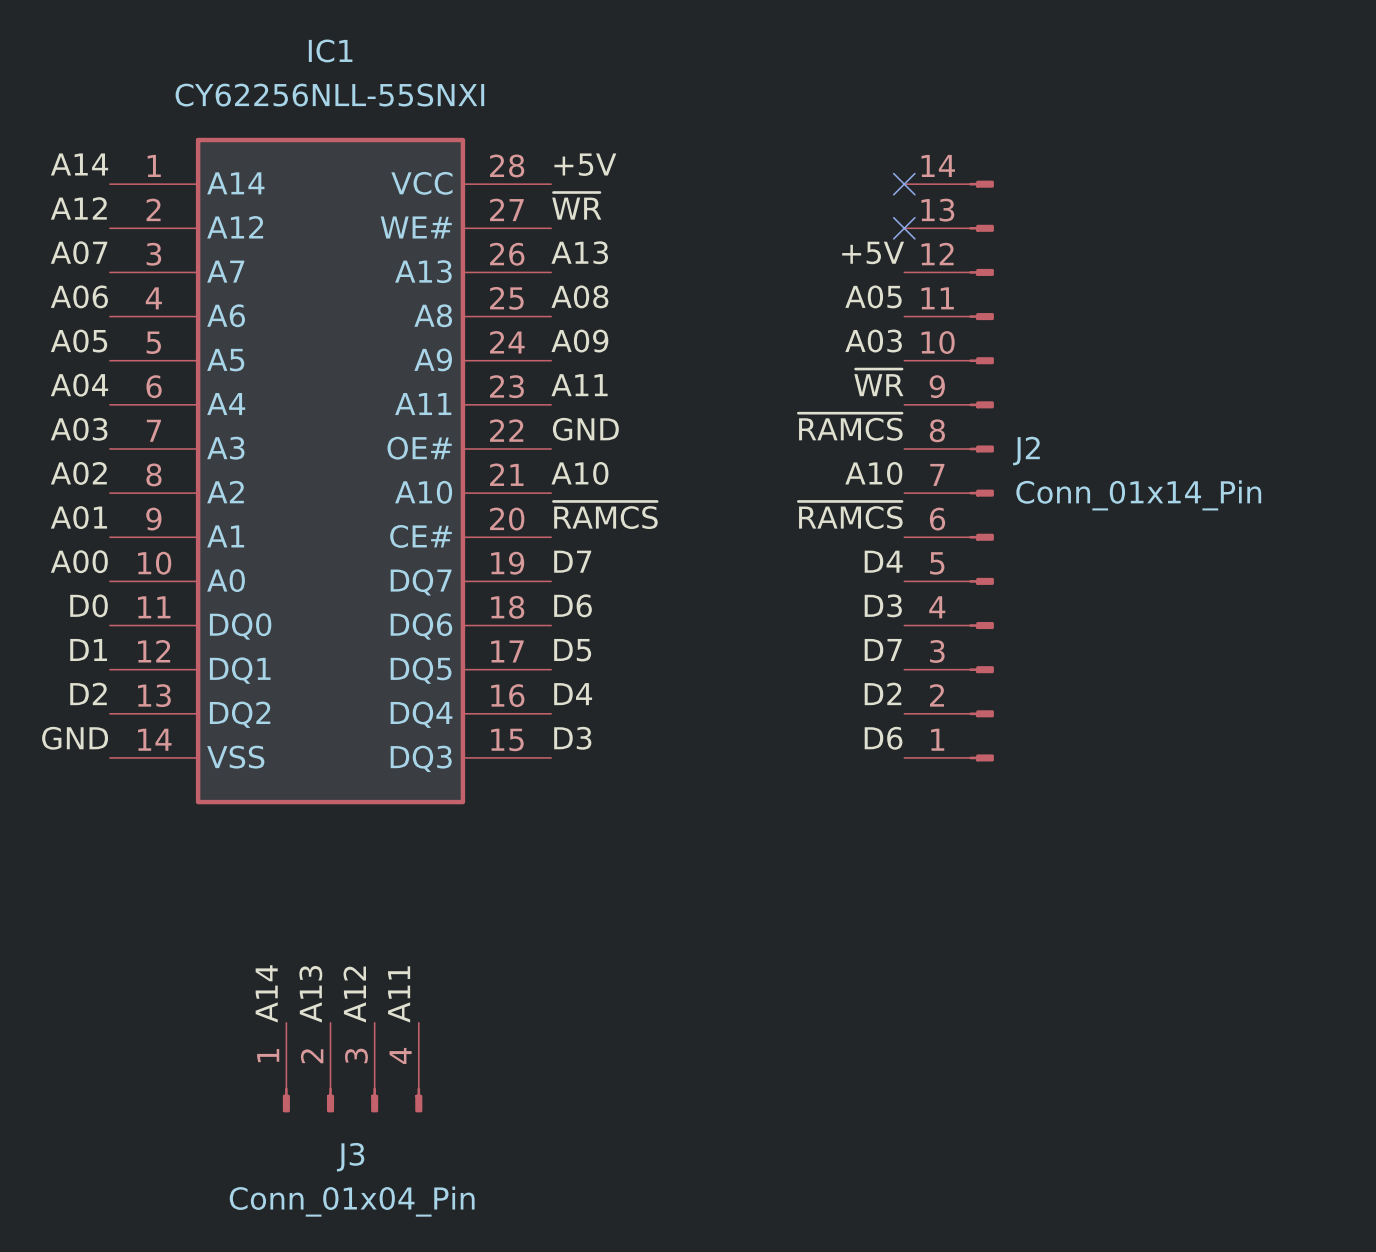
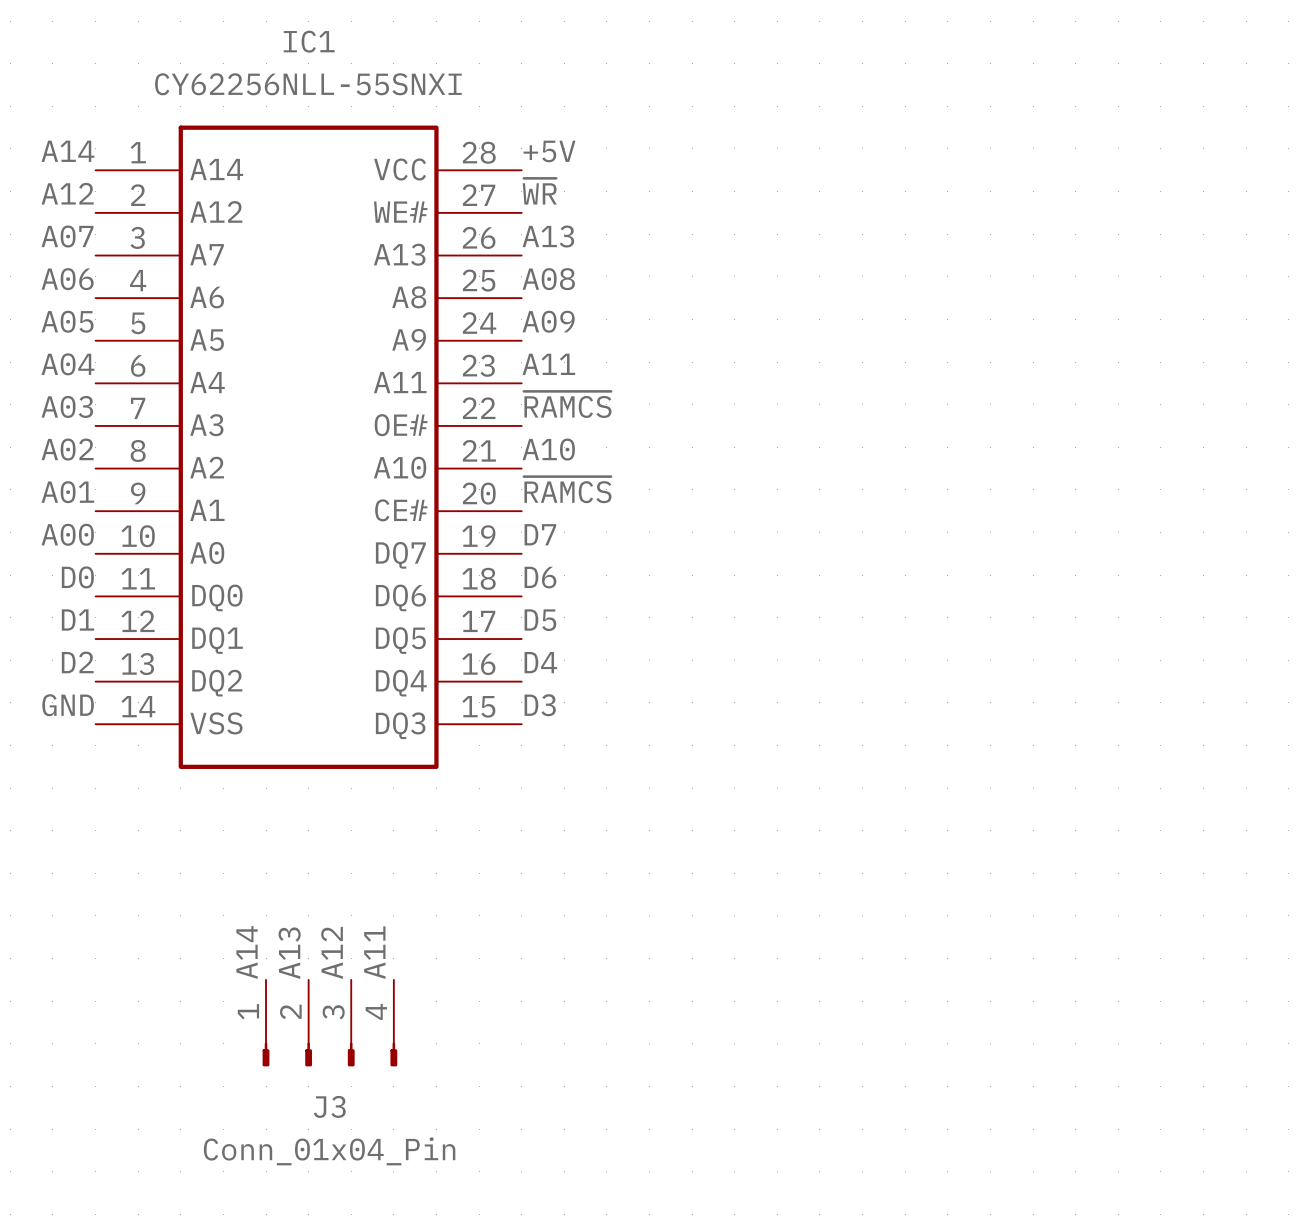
no-connect mark: (904, 184) -> none
no-connect mark: (904, 228) -> none
label: +5V (873, 252) -> none
label: A05 (873, 296) -> none
label: A03 (873, 341) -> none
label: ~{WR} (878, 382) -> none
label: ~{RAMCS} (850, 426) -> none
label: GND (585, 429) -> ~{RAMCS} (567, 404)
J2: Conn_01x14_Pin (949, 471) -> none
label: A10 (873, 473) -> none
label: ~{RAMCS} (850, 515) -> none
label: D4 (883, 561) -> none
label: D3 (883, 605) -> none
label: D7 (883, 649) -> none
label: D2 (882, 693) -> none
label: D6 (883, 738) -> none

